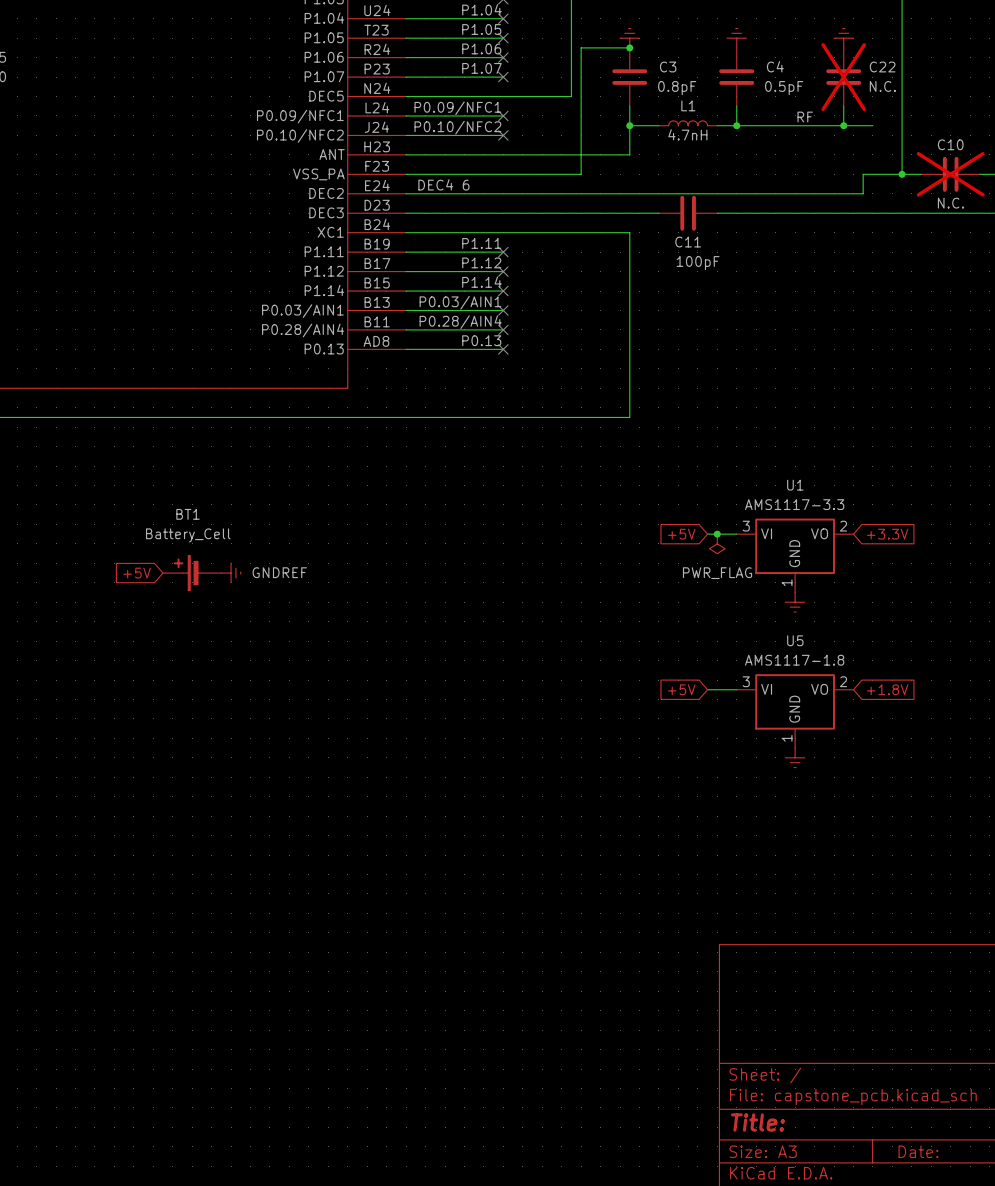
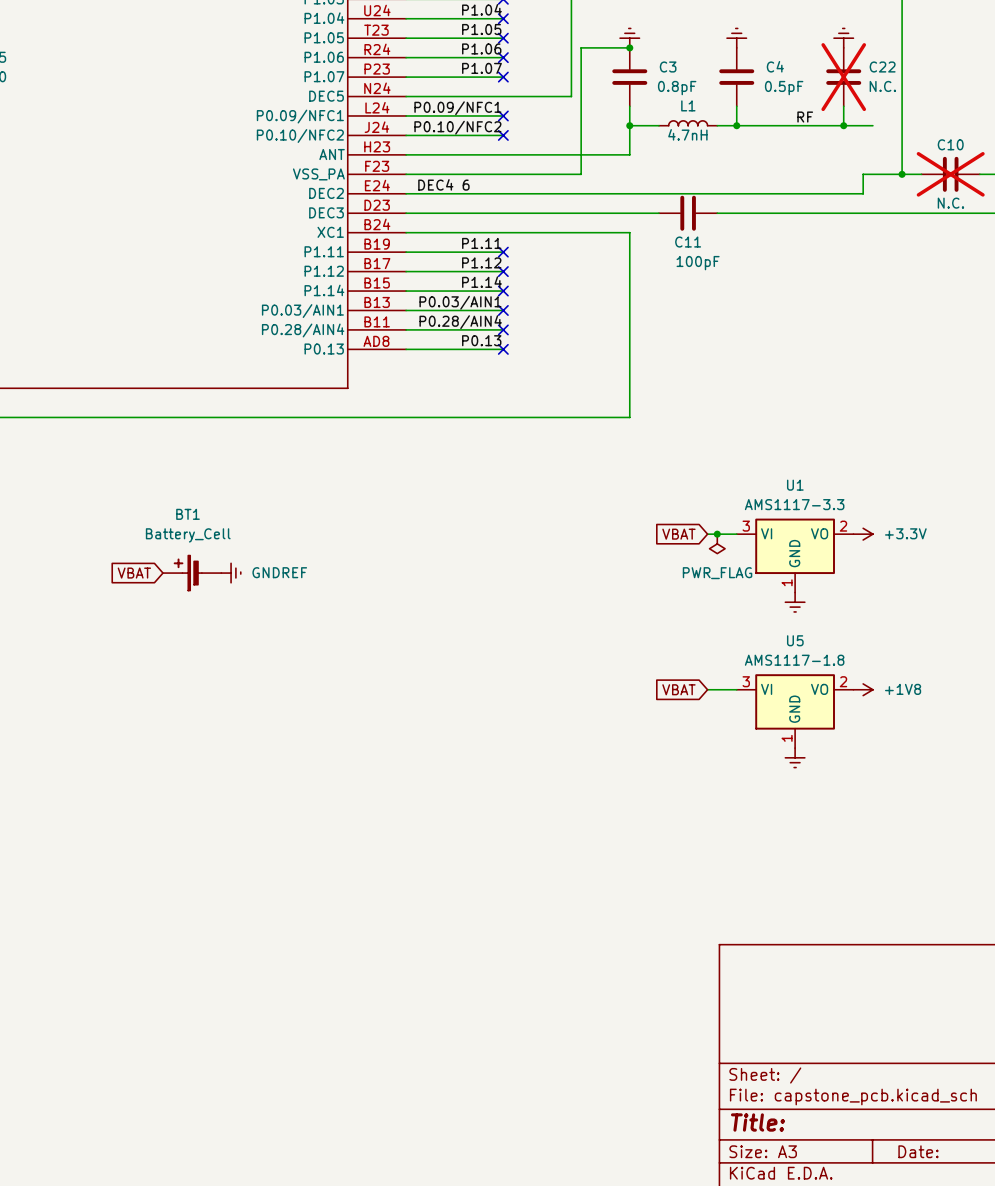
global label: +5V (681, 534) -> VBAT (678, 534)
power symbol: none -> +3.3V (863, 534)
global label: +3.3V (887, 534) -> none
global label: +5V (137, 573) -> VBAT (134, 573)
global label: +5V (681, 689) -> VBAT (678, 689)
power symbol: none -> +1V8 (863, 689)
global label: +1.8V (887, 689) -> none

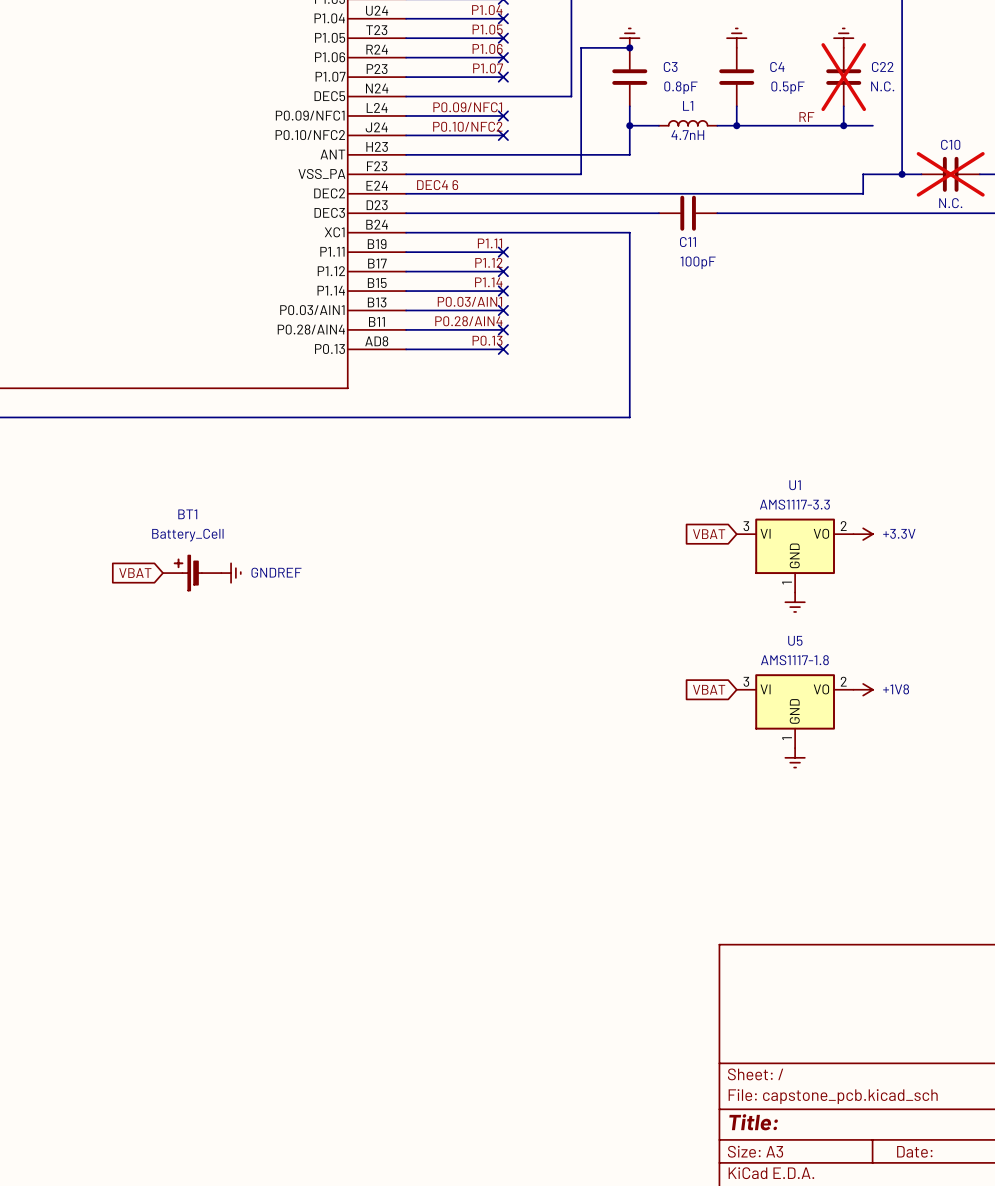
global label position: VBAT (678, 534) -> VBAT (709, 534)
wire: (707, 534) (736, 534) -> none
junction: (717, 534) -> none
power symbol: PWR_FLAG (717, 543) -> none
global label position: VBAT (678, 689) -> VBAT (709, 689)
wire: (707, 689) (736, 689) -> none

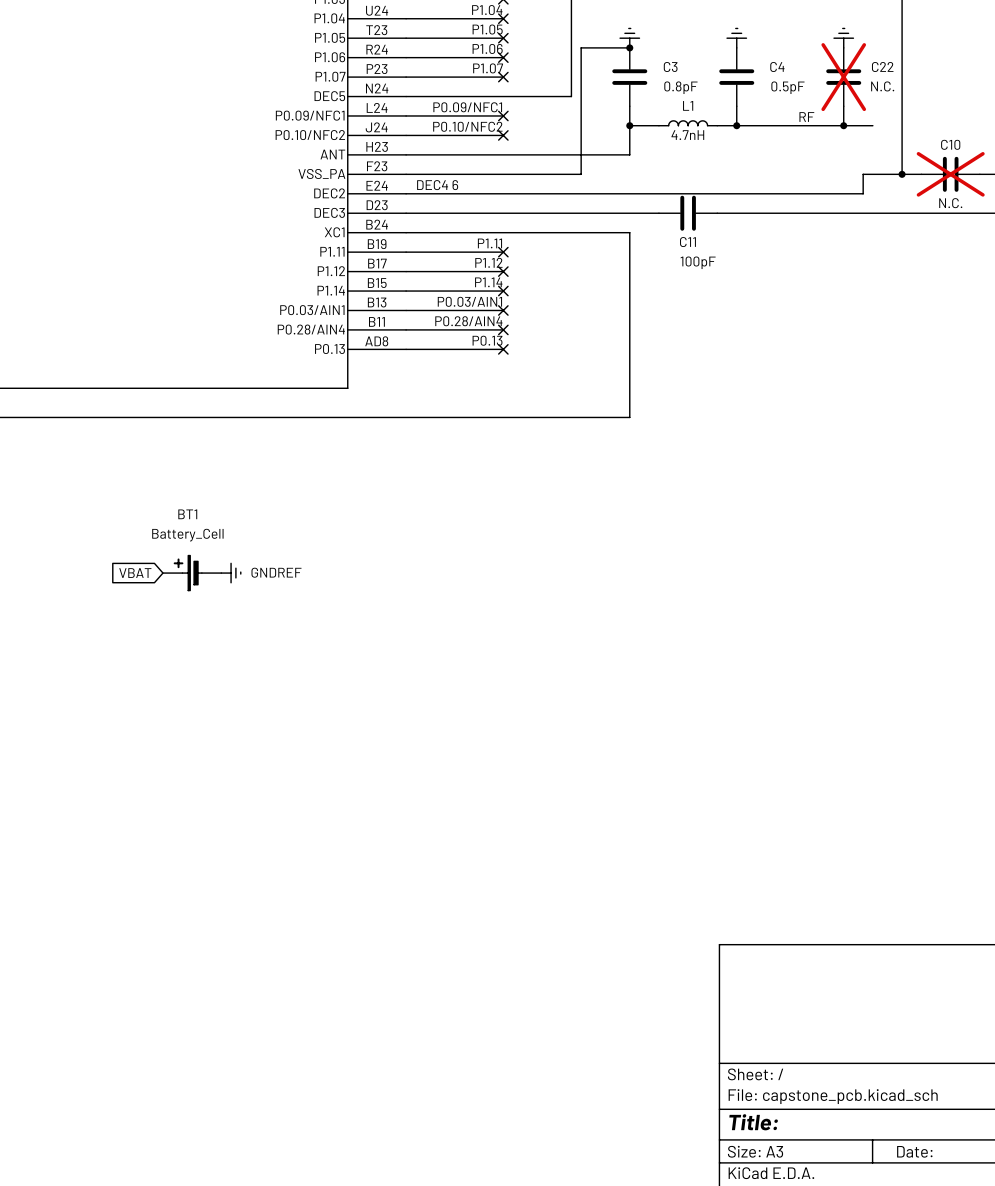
global label: VBAT (709, 534) -> none
power symbol: +3.3V (863, 534) -> none
U1: AMS1117-3.3 (795, 555) -> none
power symbol: (795, 602) -> none
global label: VBAT (709, 689) -> none
power symbol: +1V8 (863, 689) -> none
U5: AMS1117-1.8 (795, 711) -> none
power symbol: (795, 757) -> none

